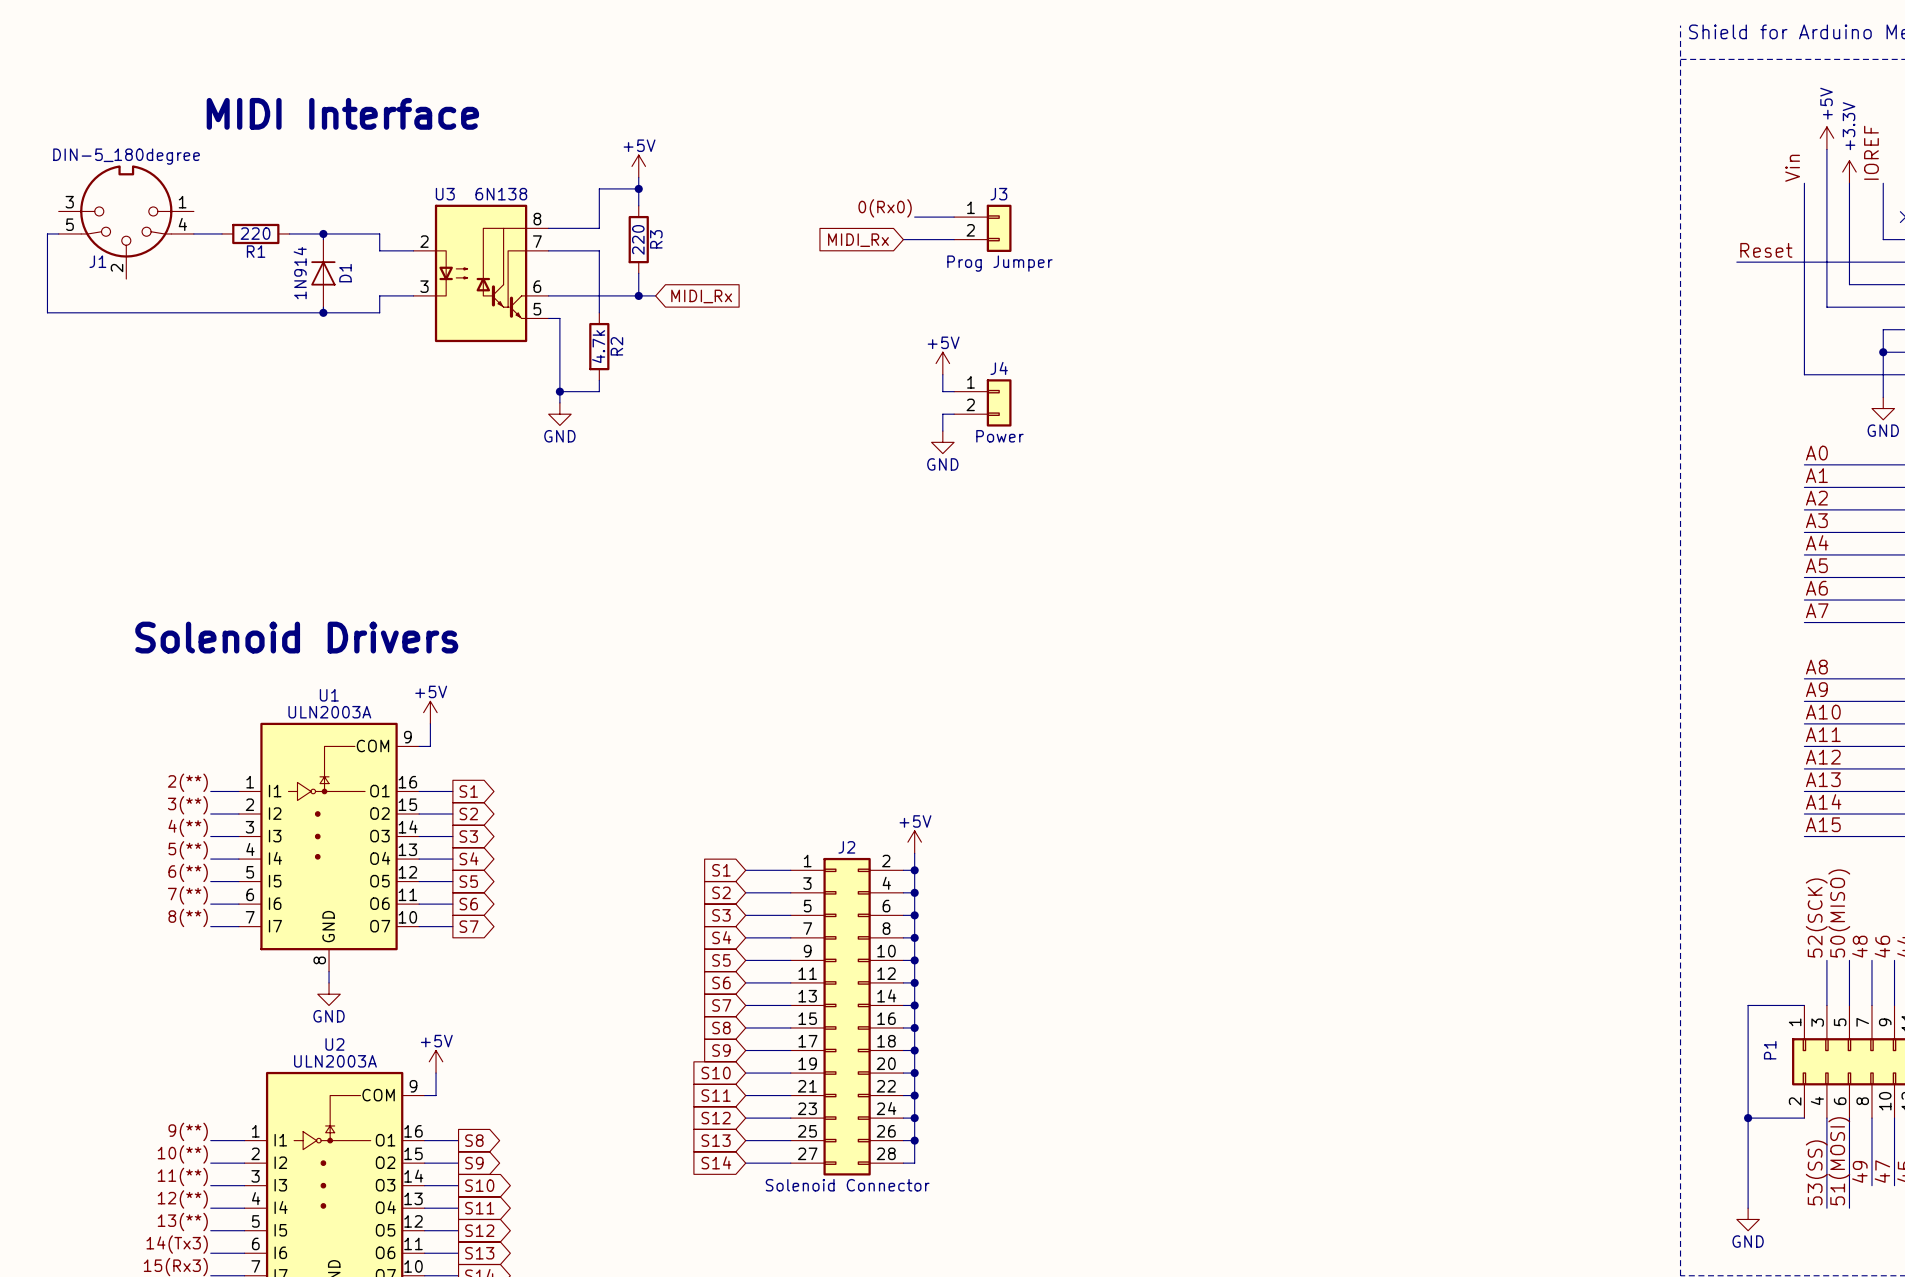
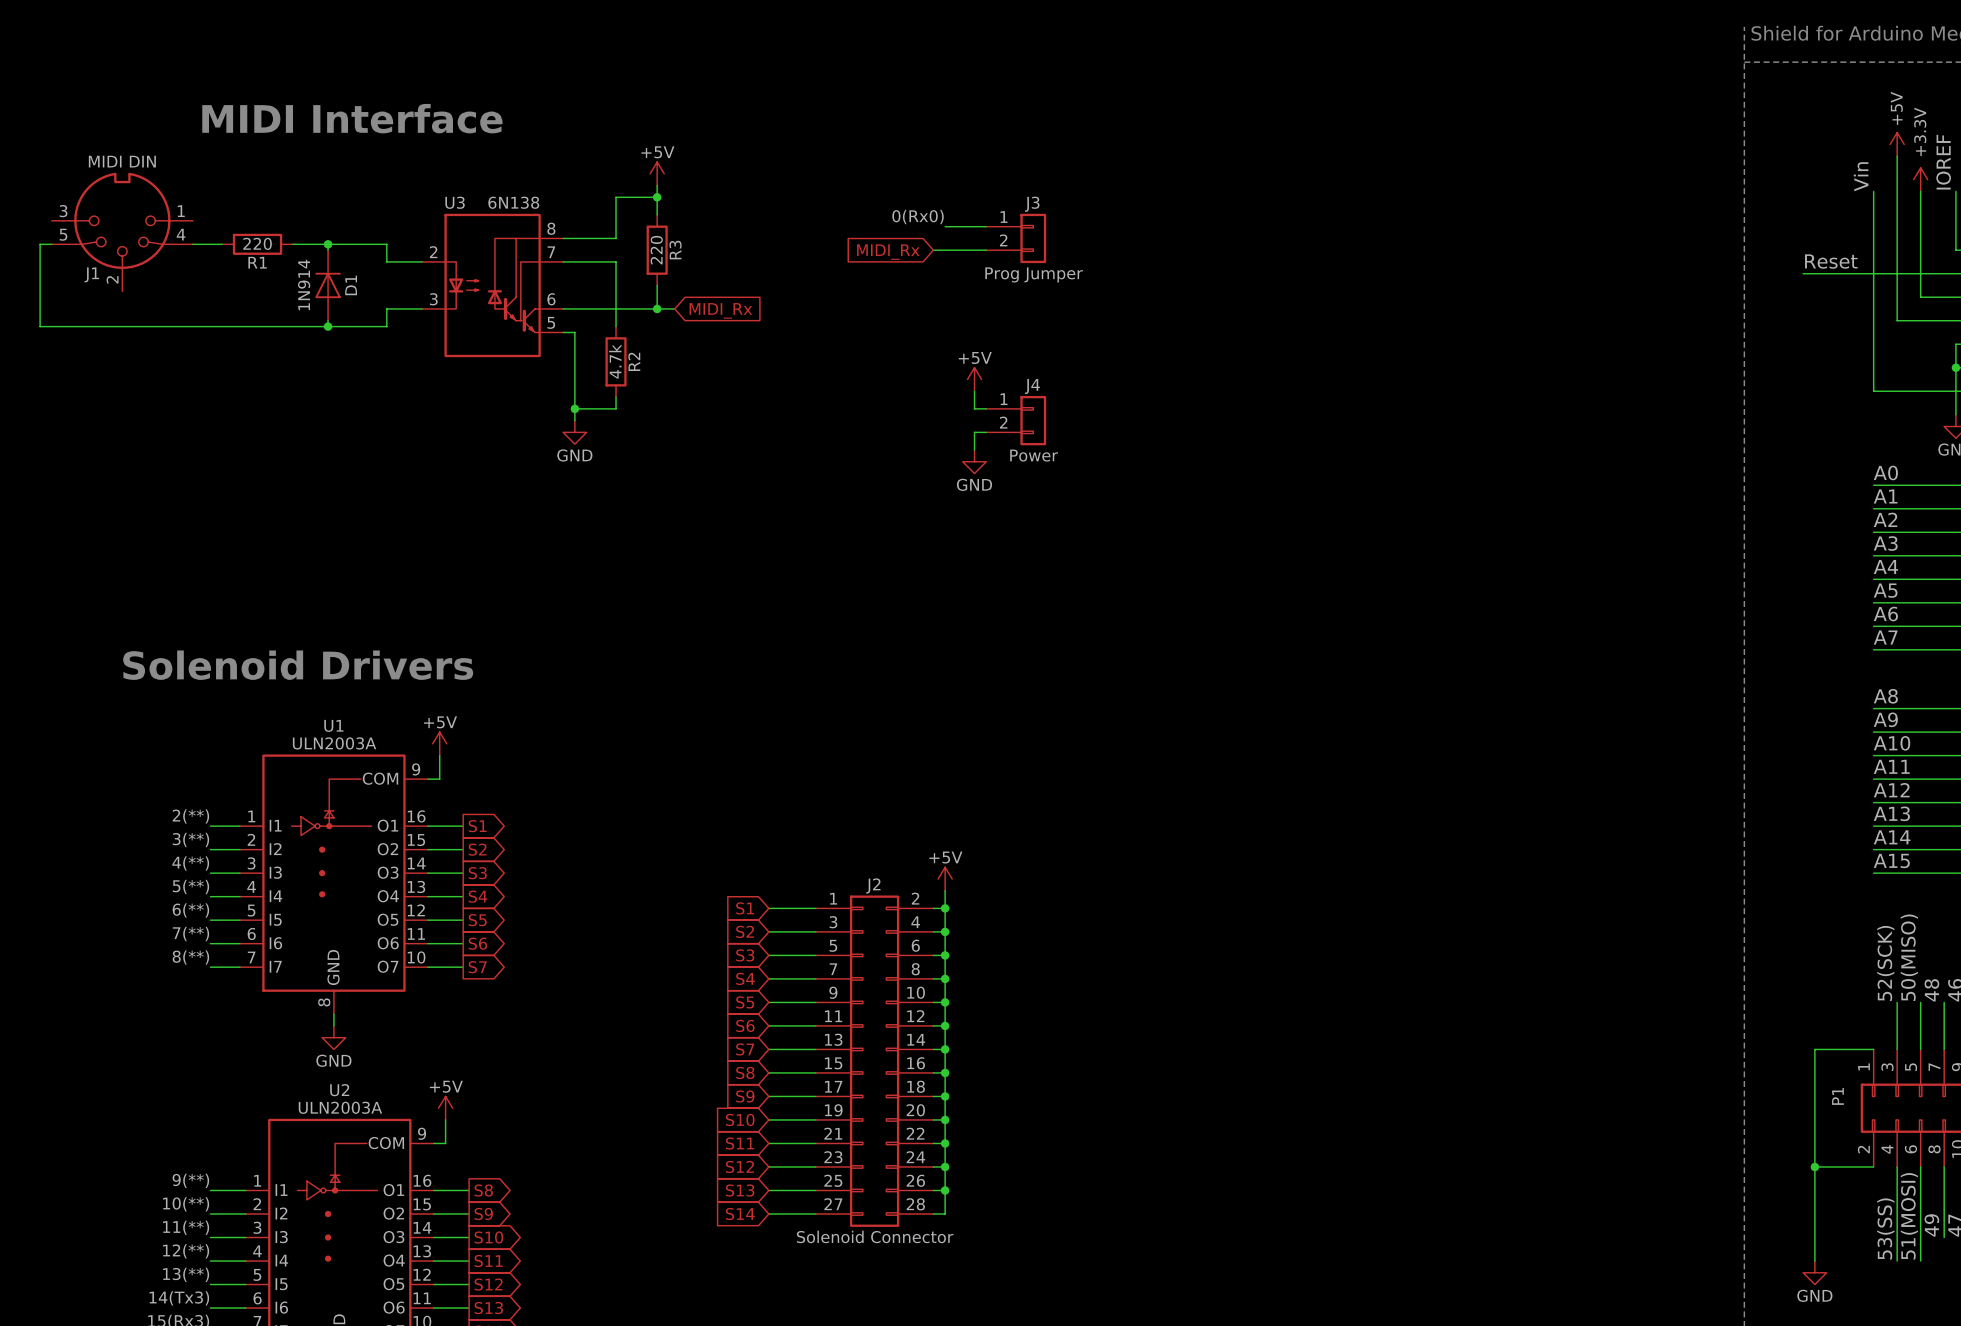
J1 value: DIN-5_180degree (126, 156) -> MIDI DIN (122, 161)

